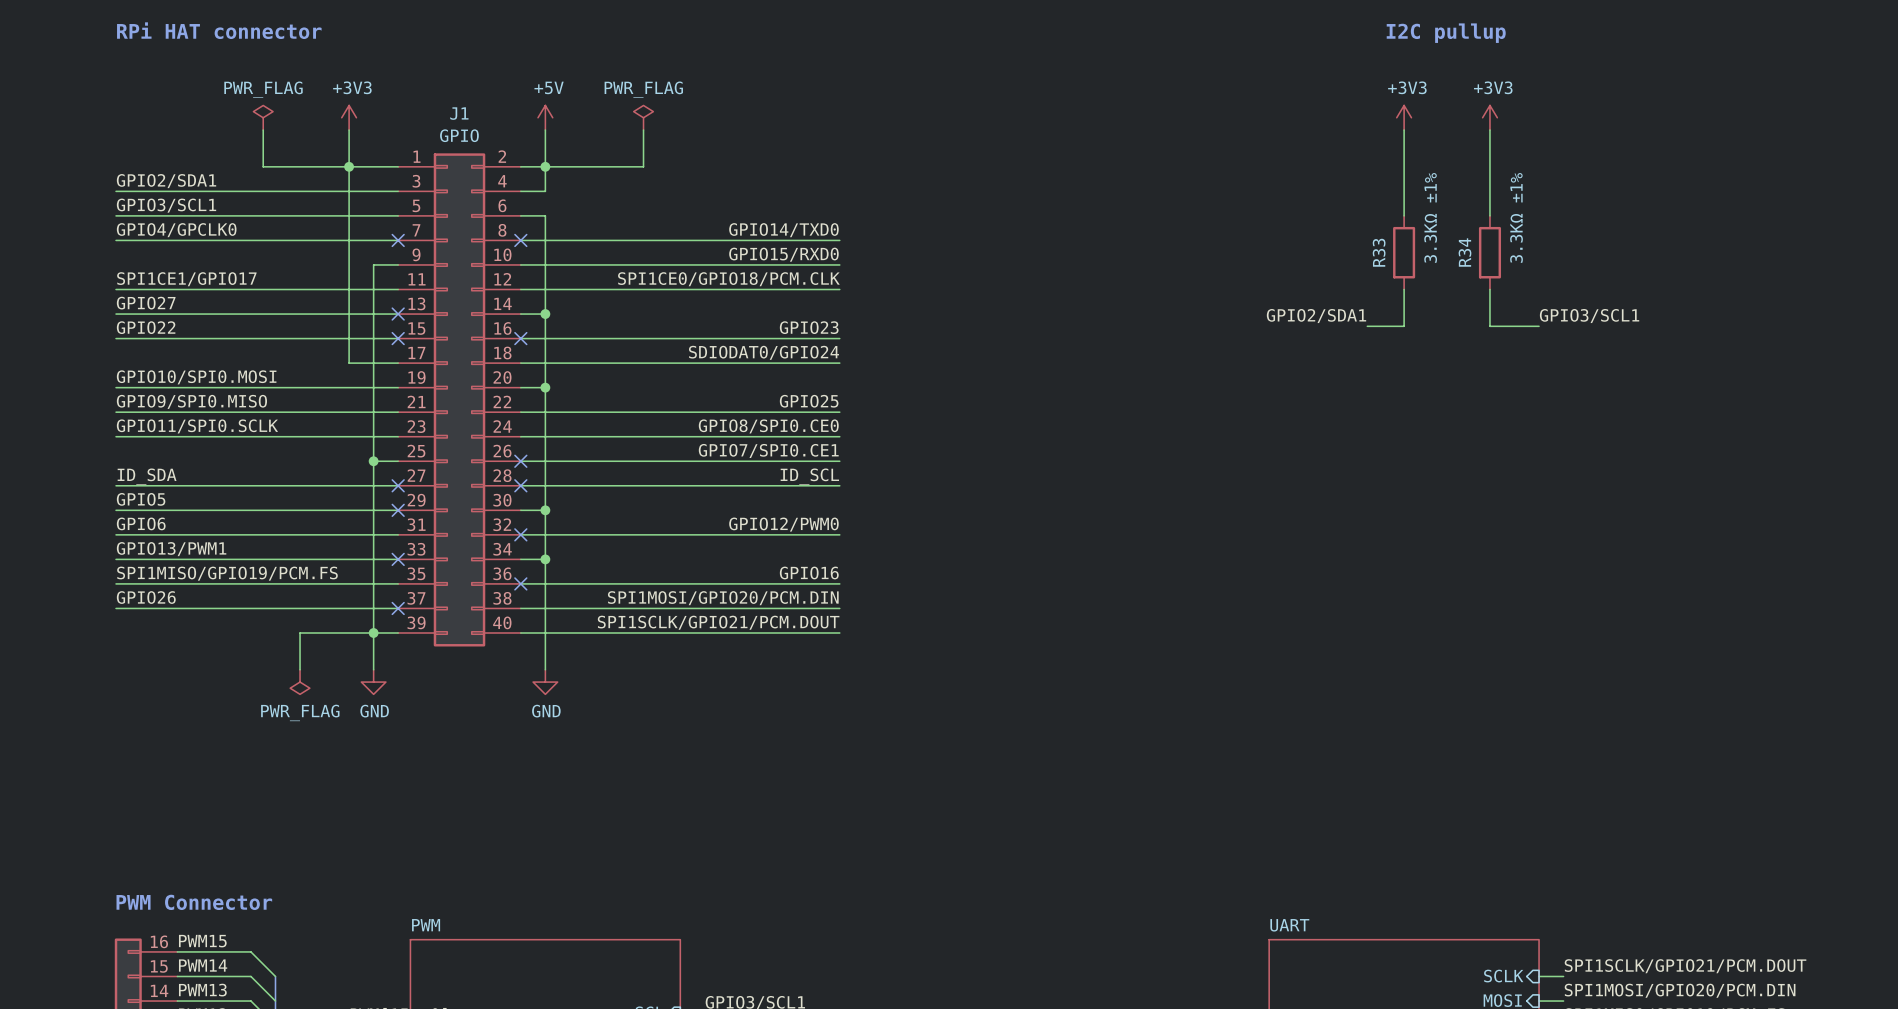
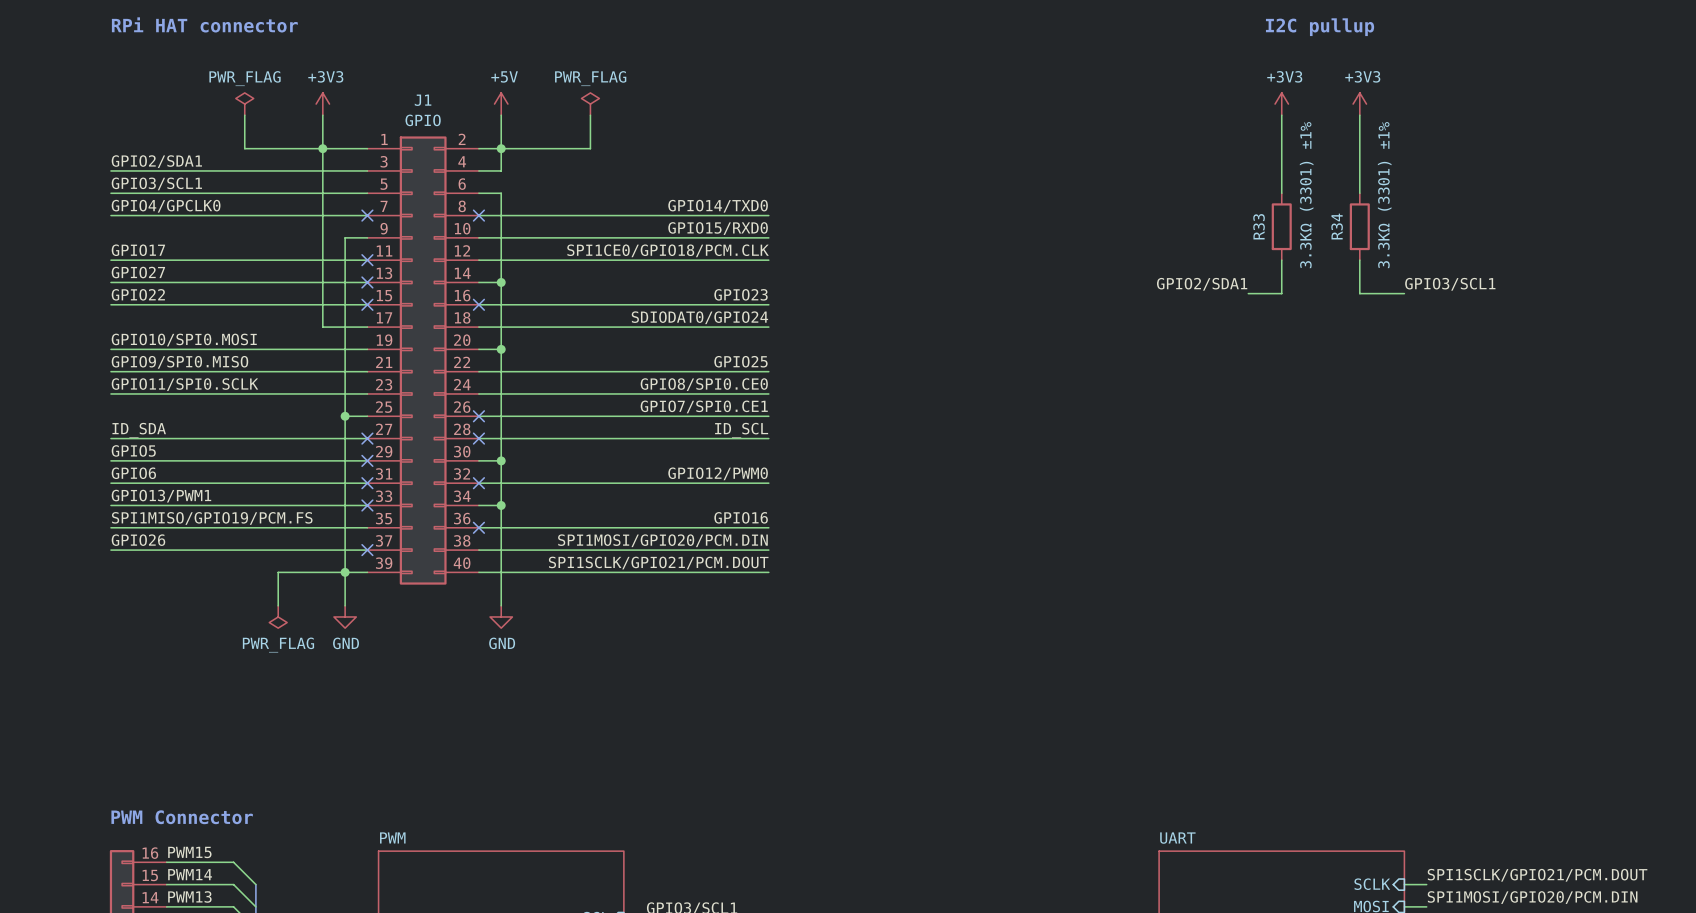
R33 value: 3.3KΩ ±1% (1430, 217) -> 3.3KΩ (3301) ±1% (1306, 195)
R34 value: 3.3KΩ ±1% (1516, 217) -> 3.3KΩ (3301) ±1% (1384, 195)
label: SPI1CE1/GPIO17 (186, 279) -> GPIO17 (138, 250)
no-connect mark: none -> (367, 260)
no-connect mark: none -> (367, 483)

